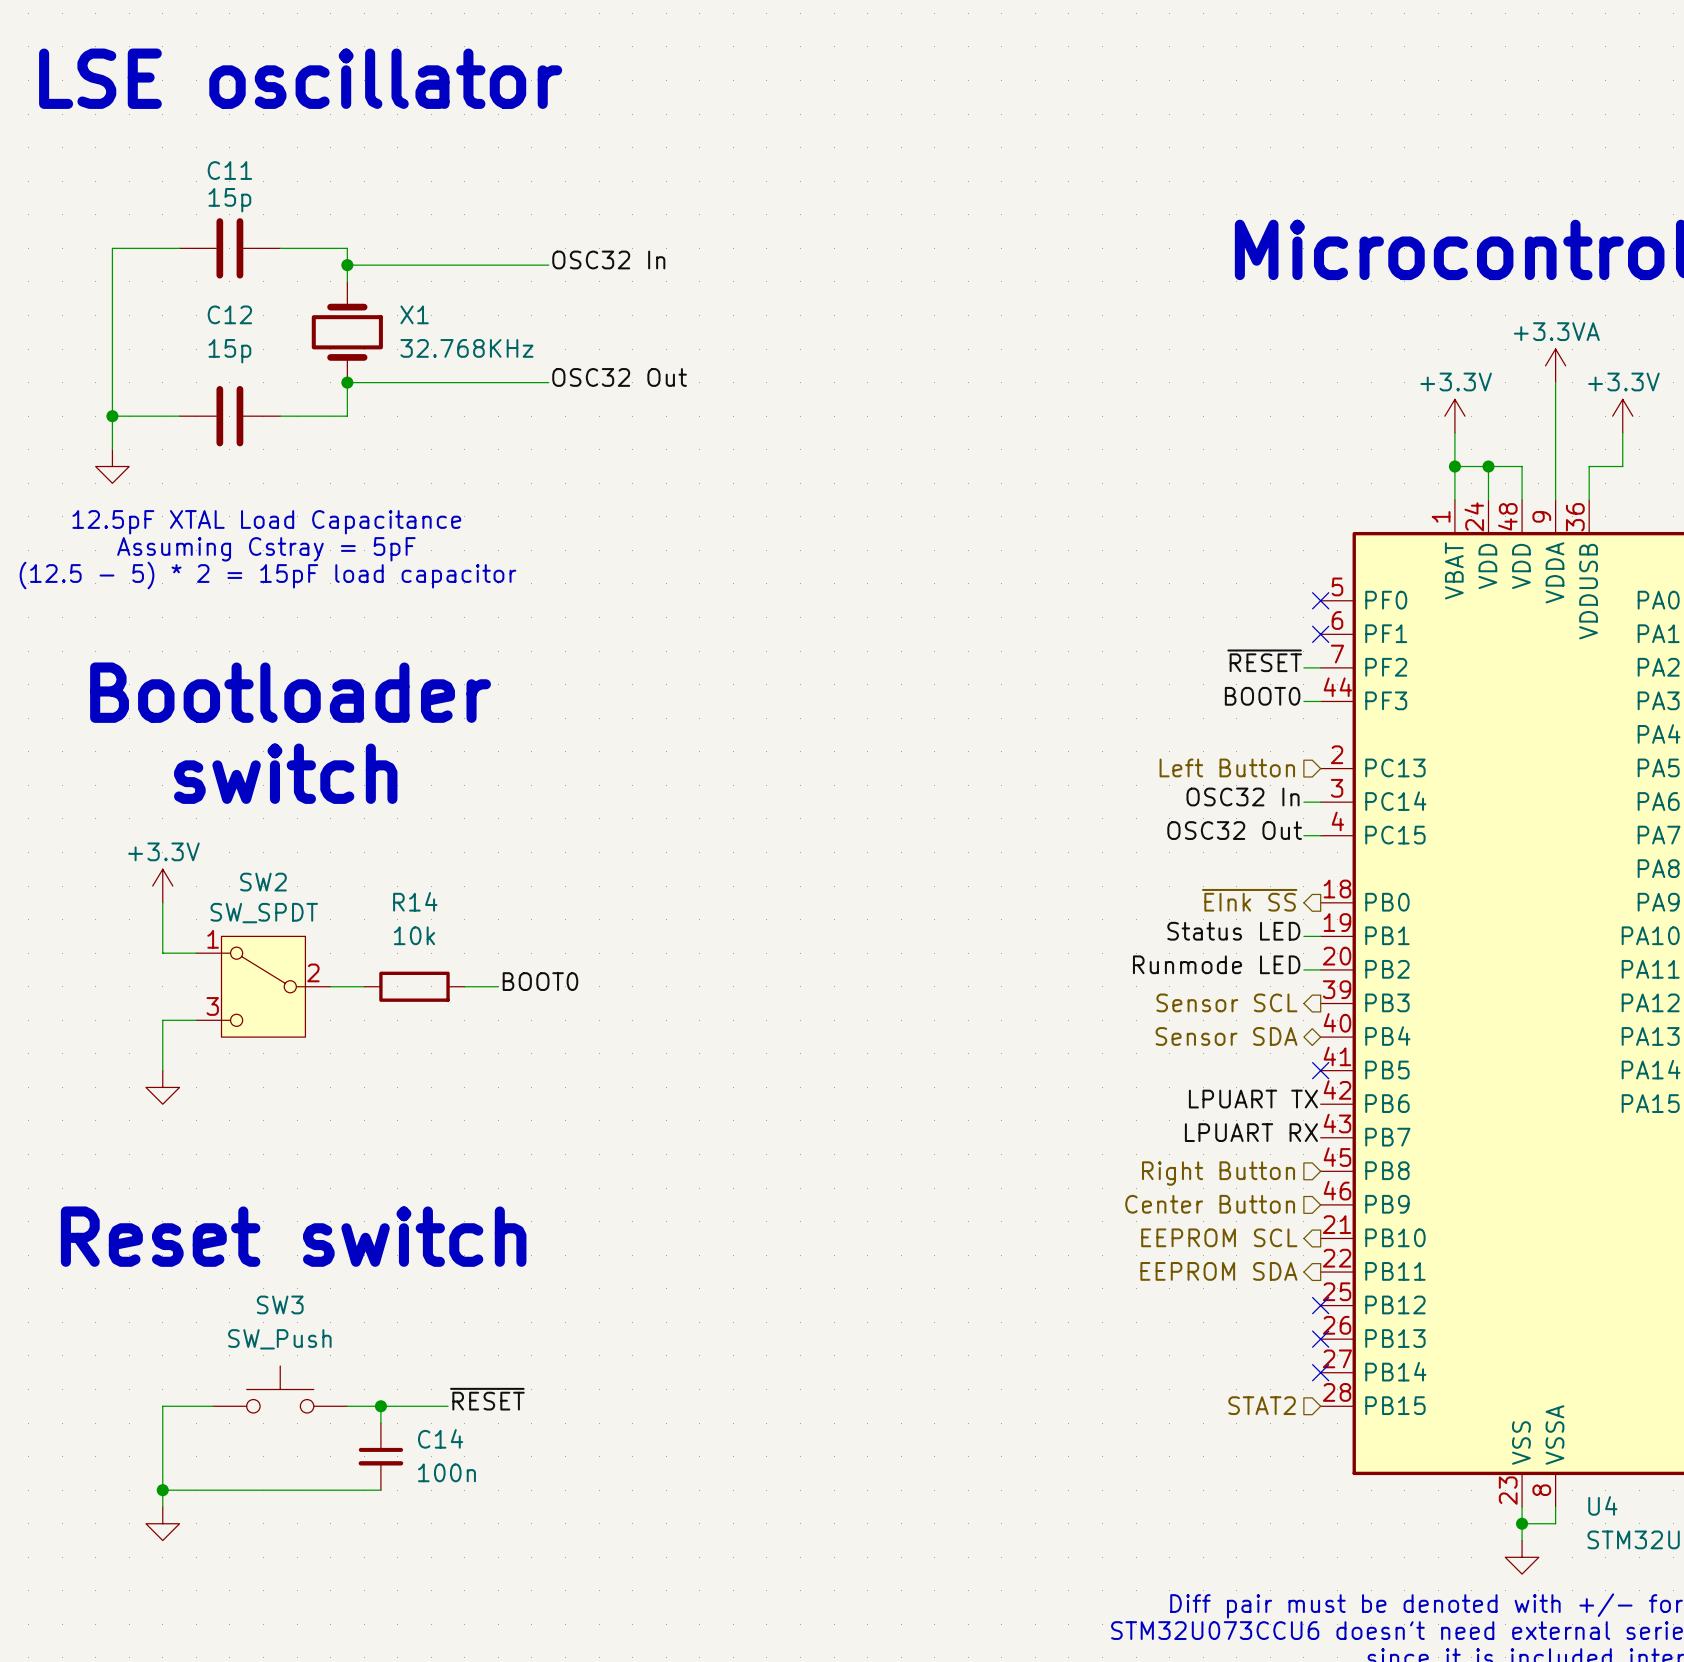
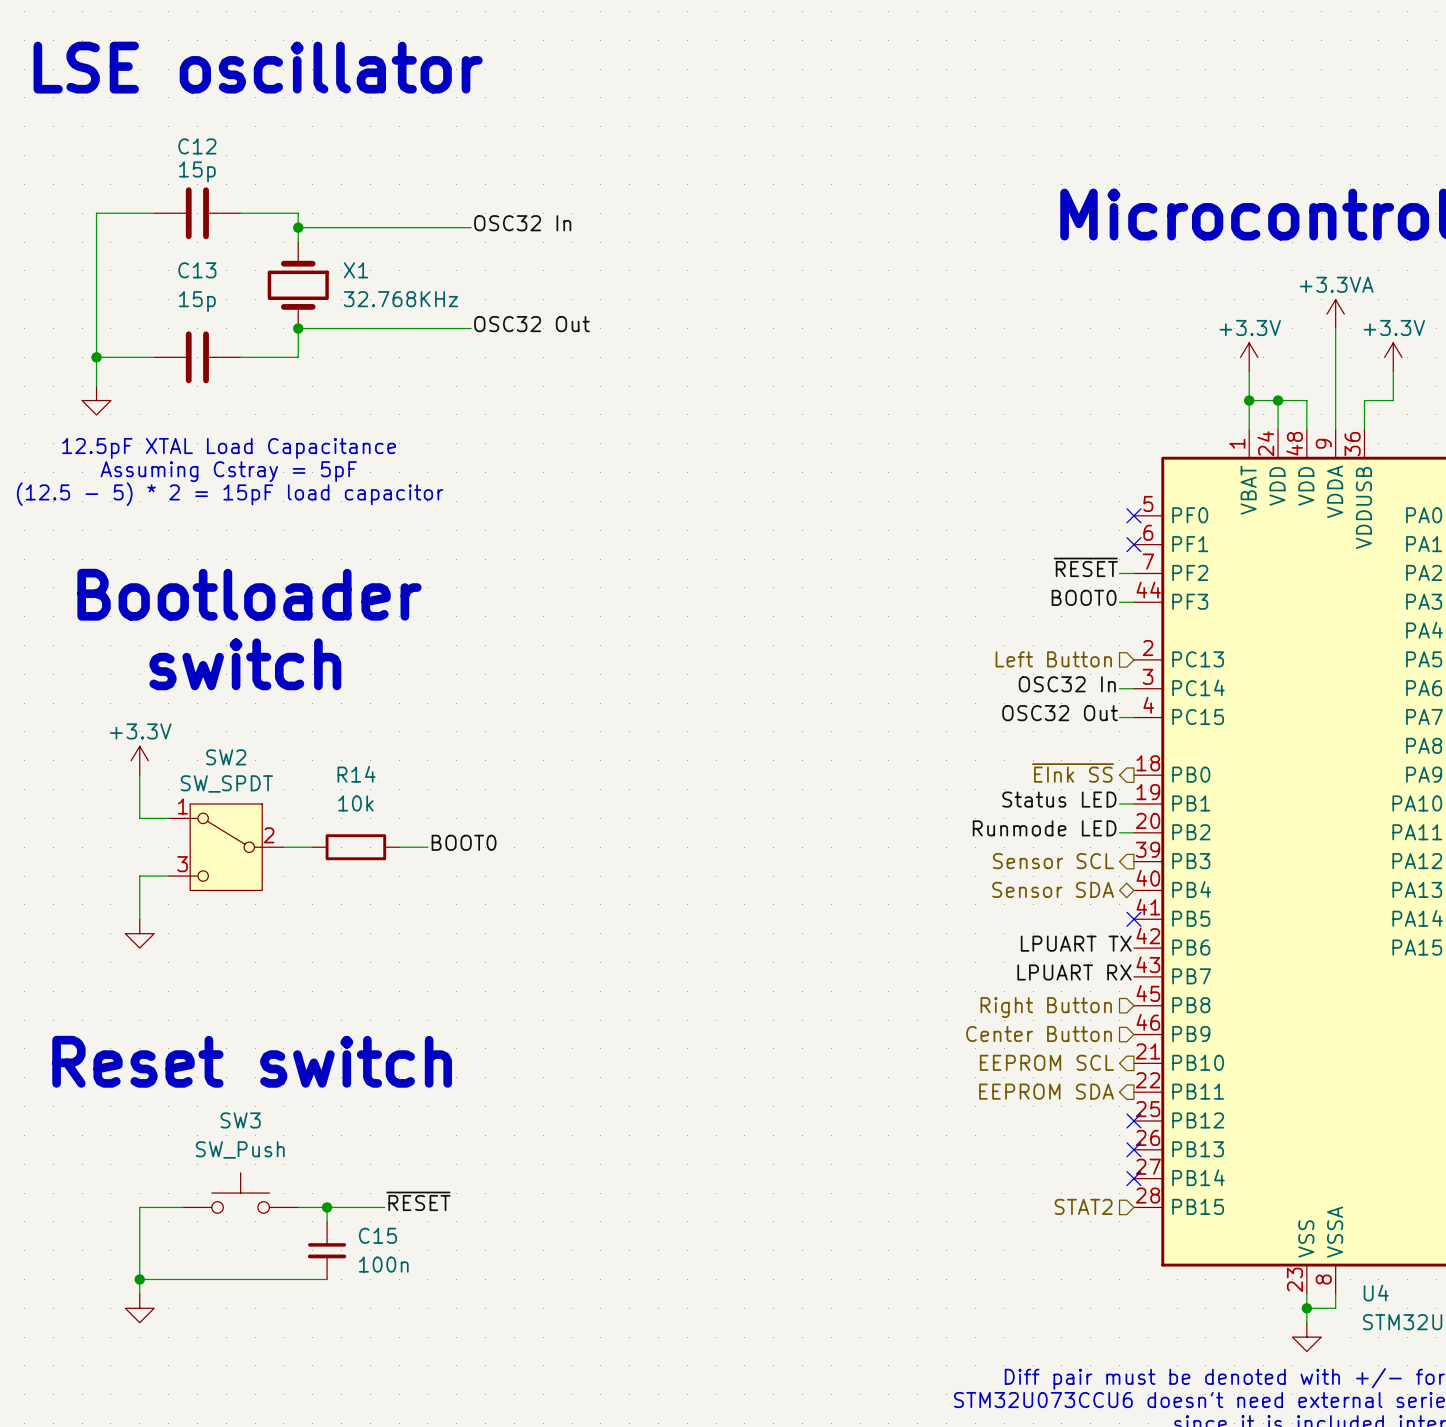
C11 name: C11 (229, 170) -> C12 (197, 146)
C12 name: C12 (229, 314) -> C13 (197, 270)
C14 name: C14 (440, 1438) -> C15 (377, 1235)

